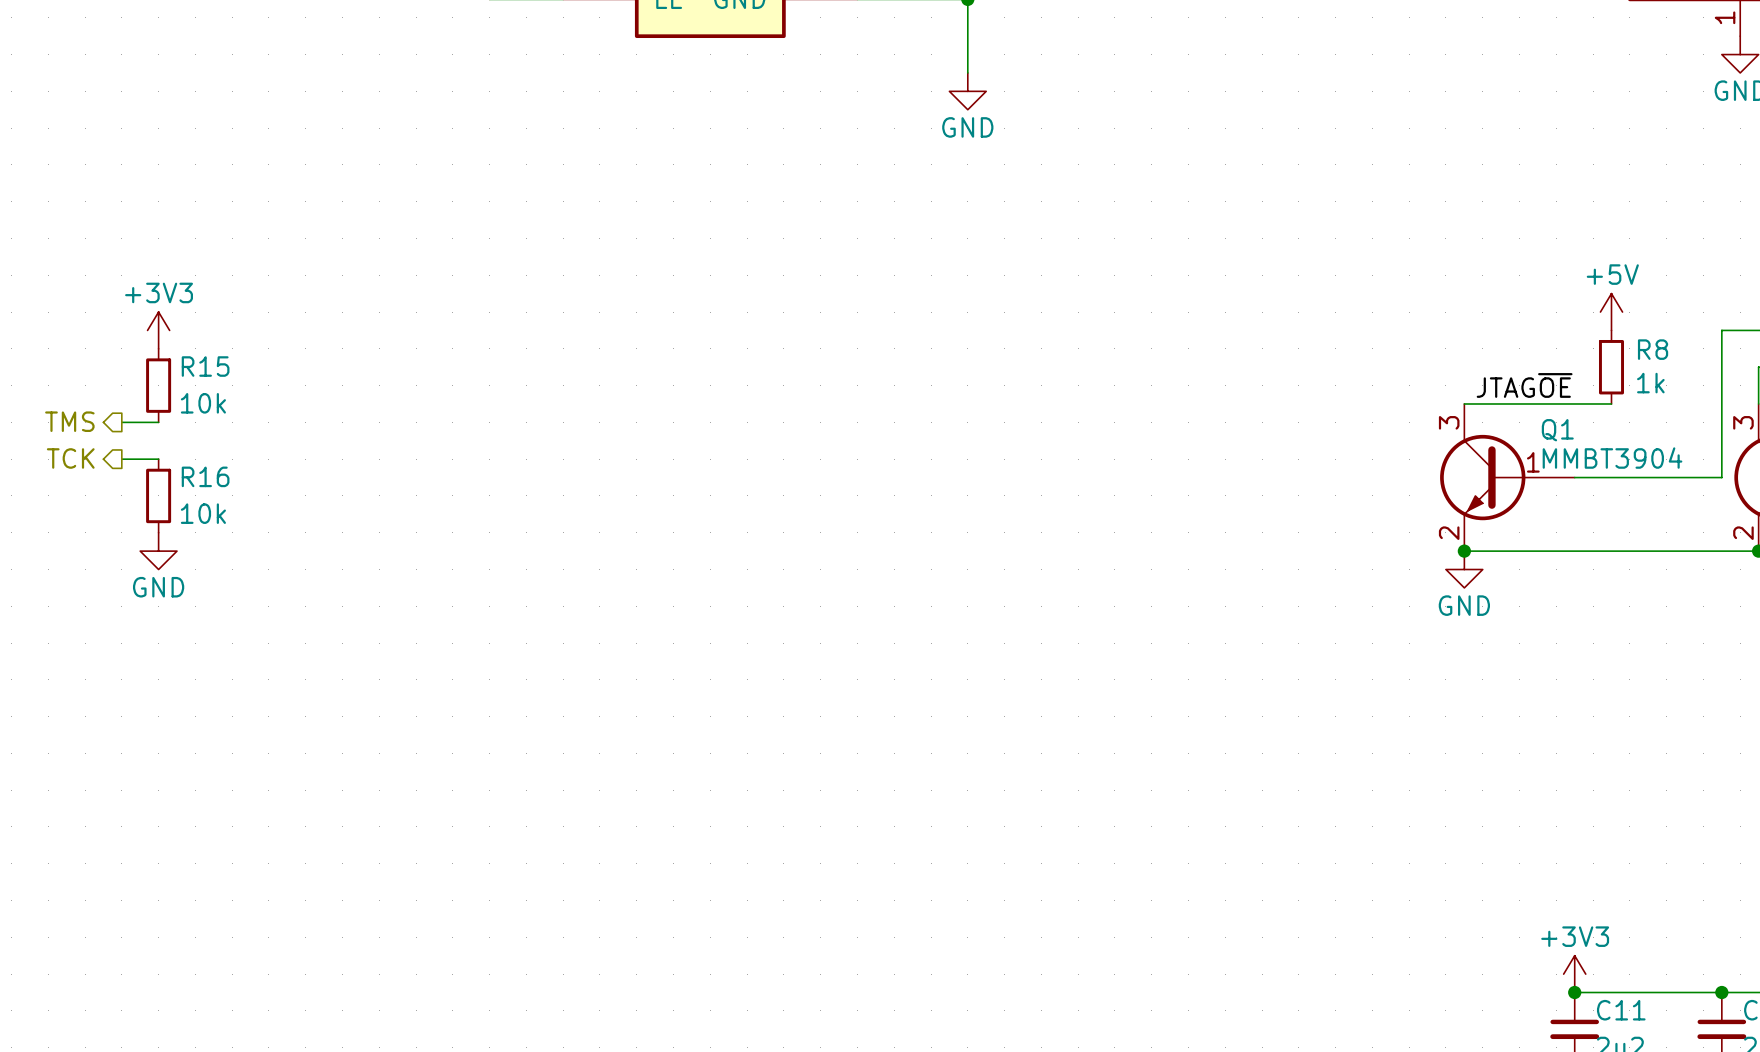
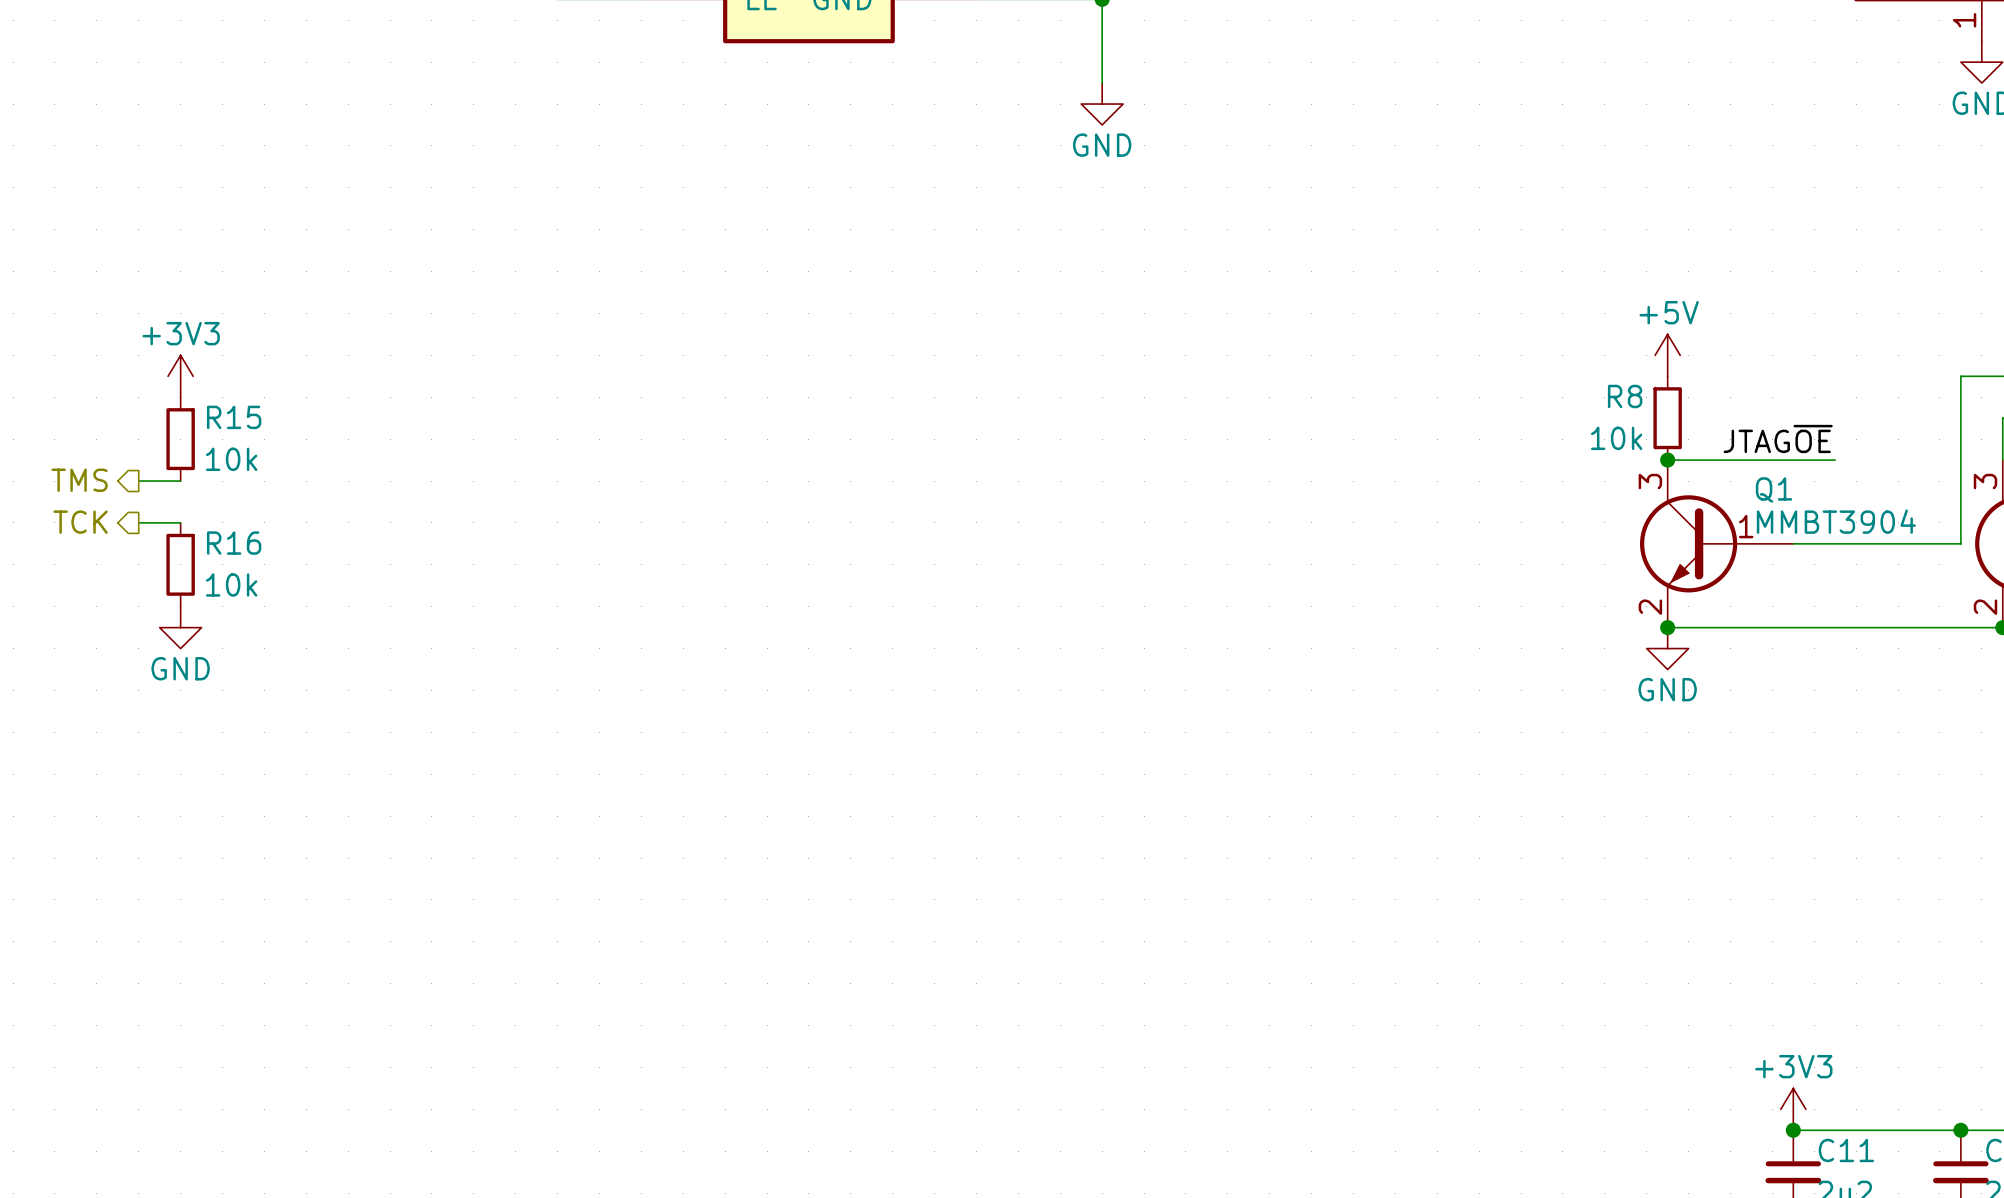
power symbol position: +5V (1611, 312) -> +5V (1667, 355)
R8 name position: R8 (1653, 349) -> R8 (1625, 396)
R8 position: (1611, 367) -> (1667, 418)
R8 value: 1k (1650, 383) -> 10k (1616, 438)
label position: JTAG~{OE} (1524, 385) -> JTAG~{OE} (1778, 438)
junction: none -> (1667, 460)

